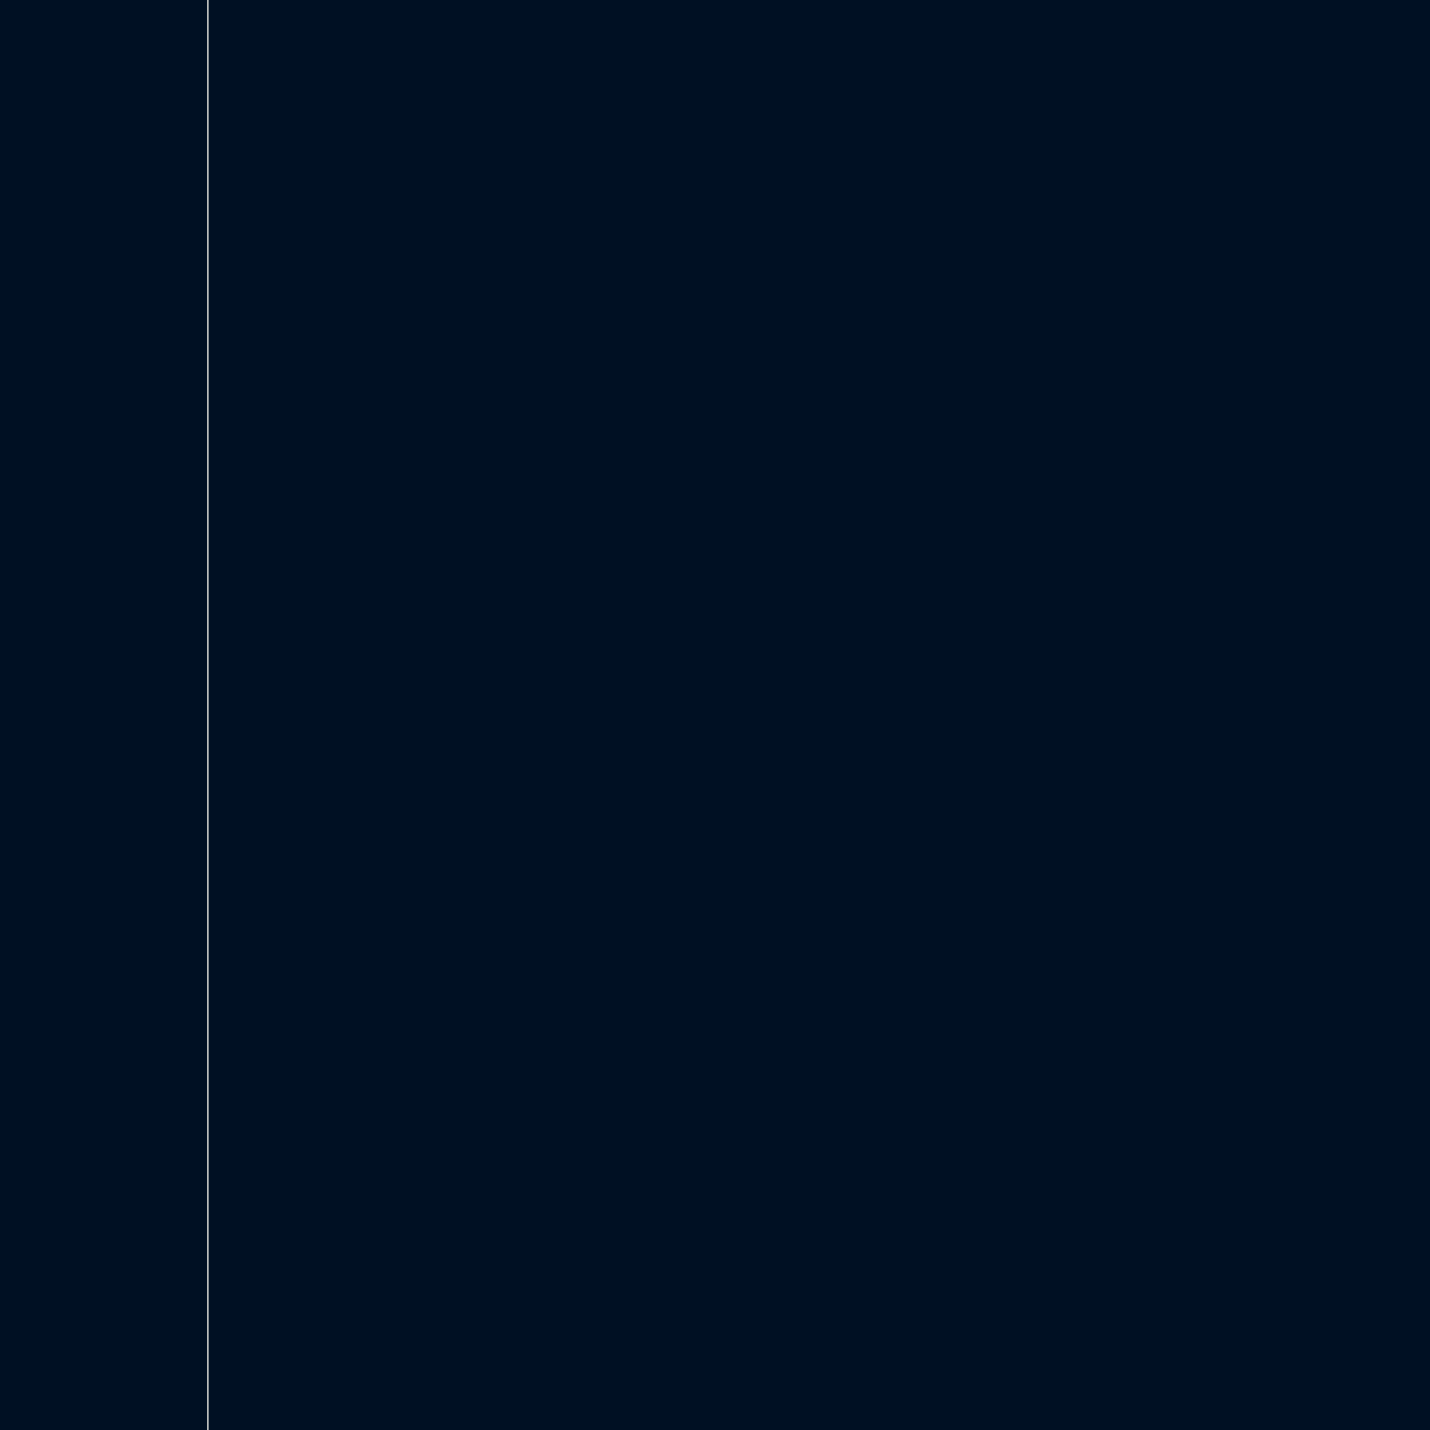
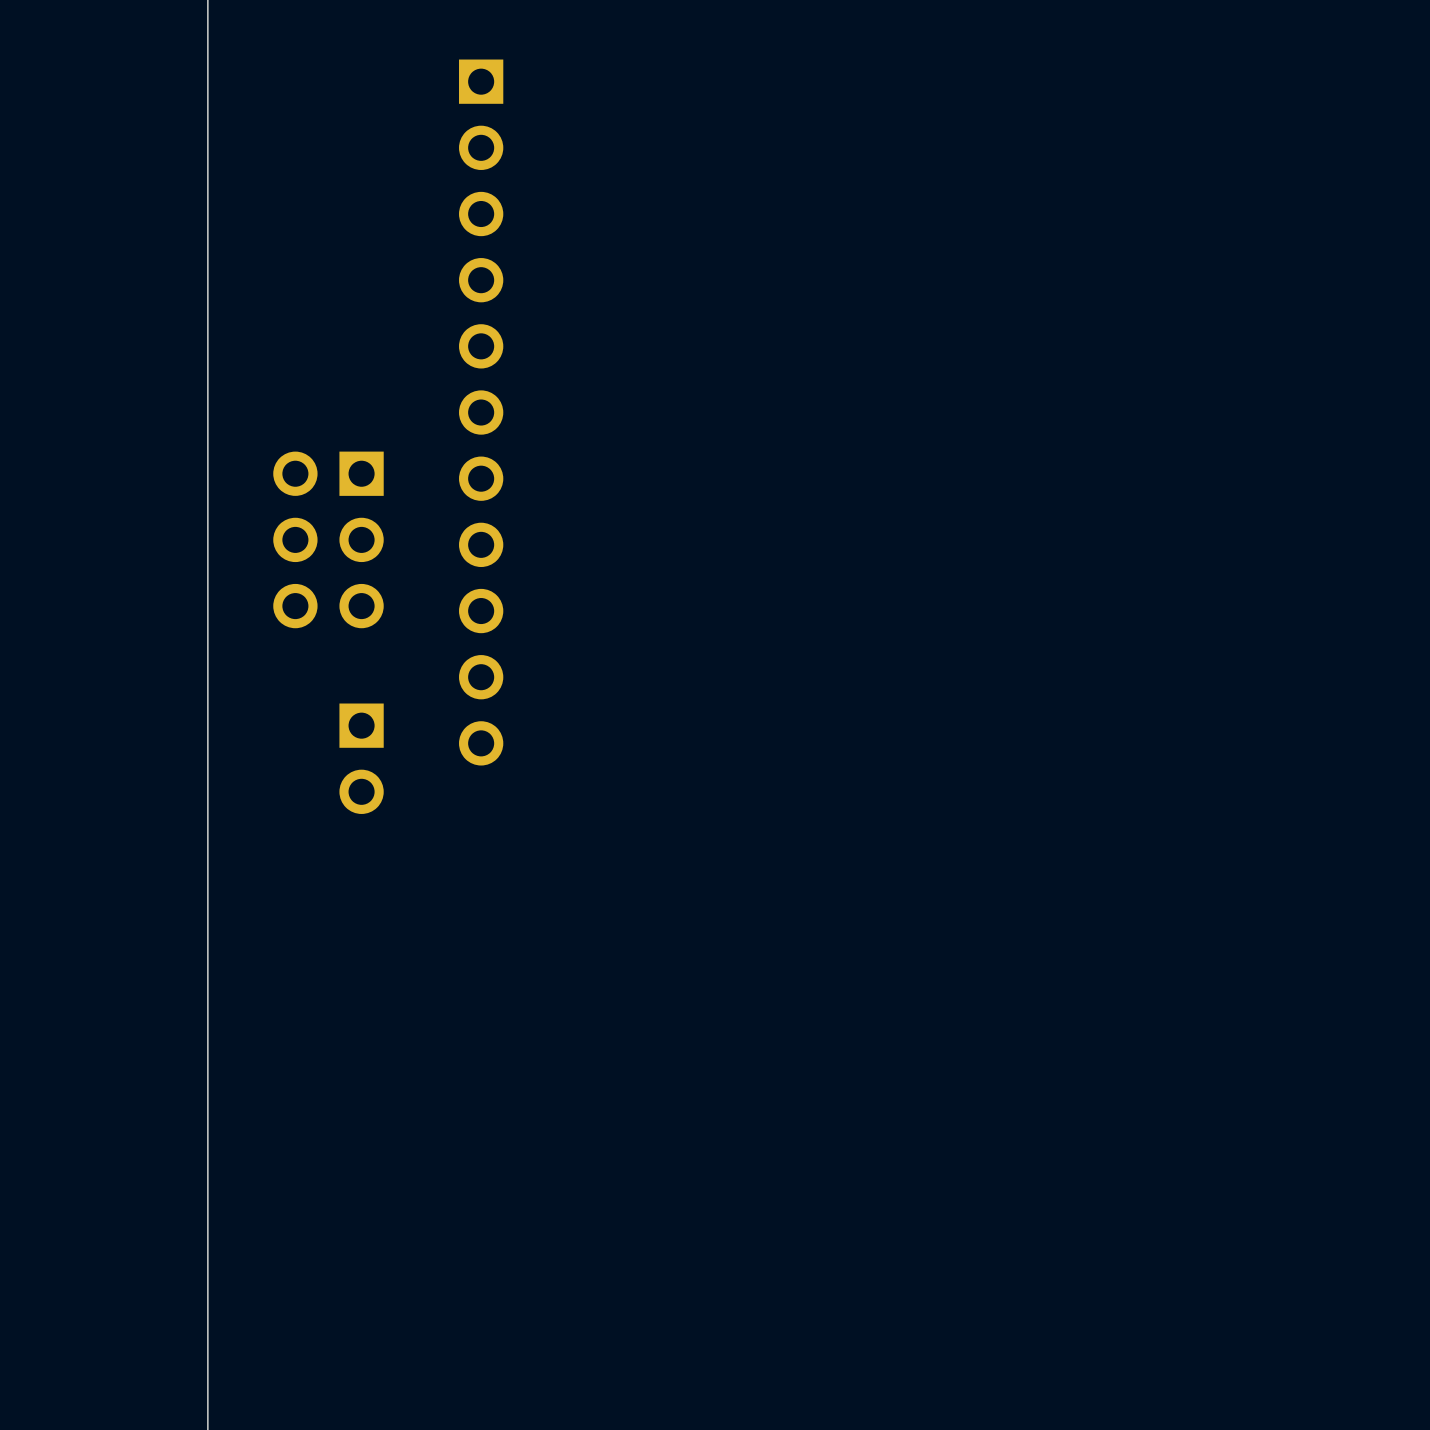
part: none -> (481, 412)
part: none -> (328, 539)
part: none -> (361, 758)

